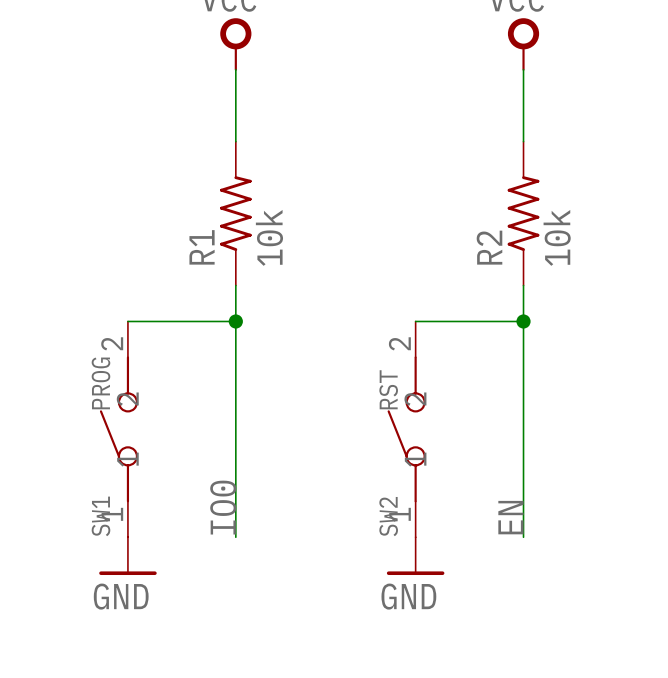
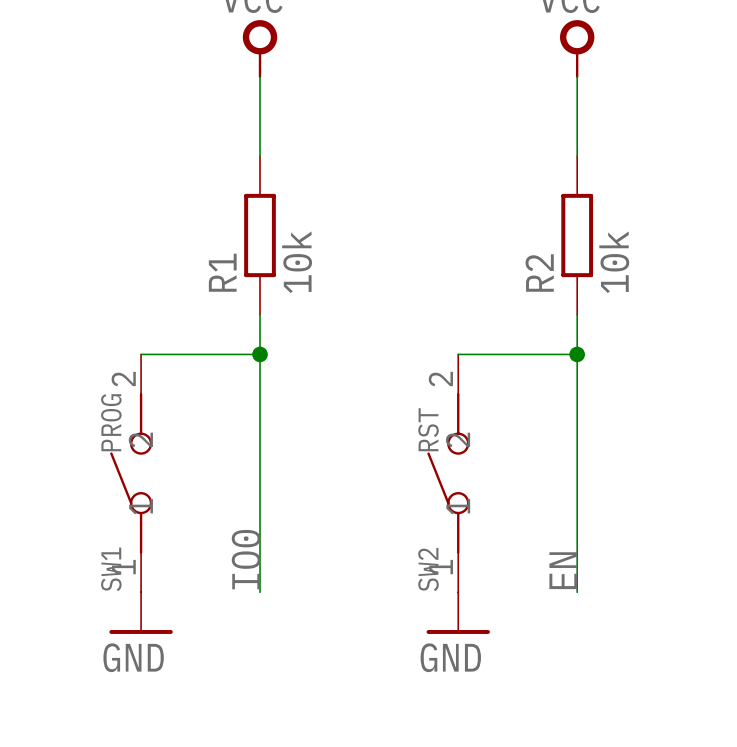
R1 symbol: [220, 141, 252, 286] -> [244, 156, 276, 315]
R2 symbol: [507, 141, 540, 286] -> [561, 156, 594, 315]

